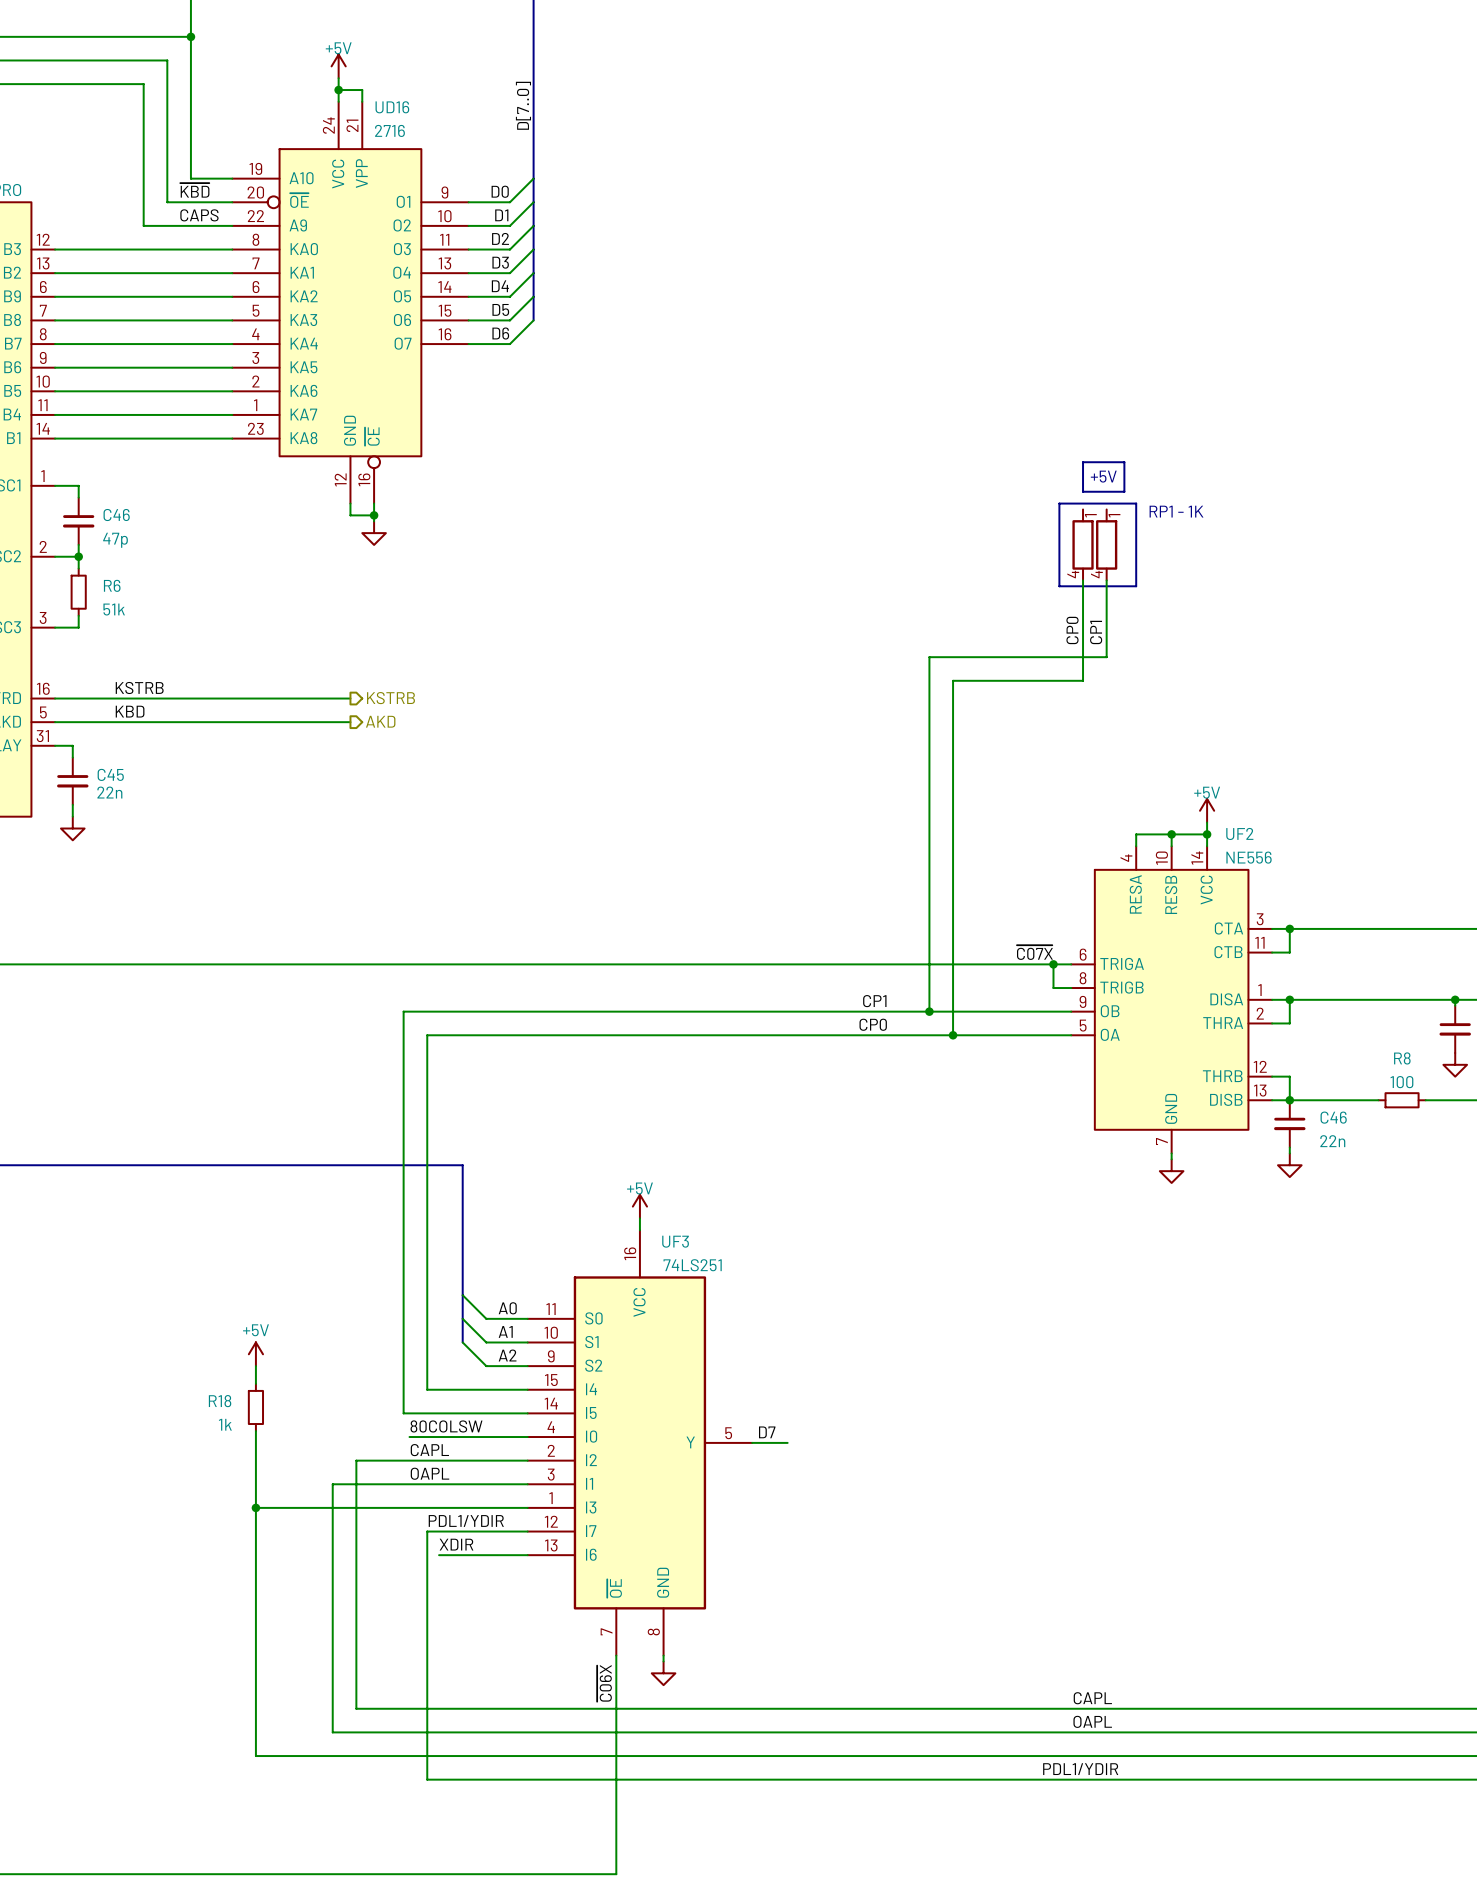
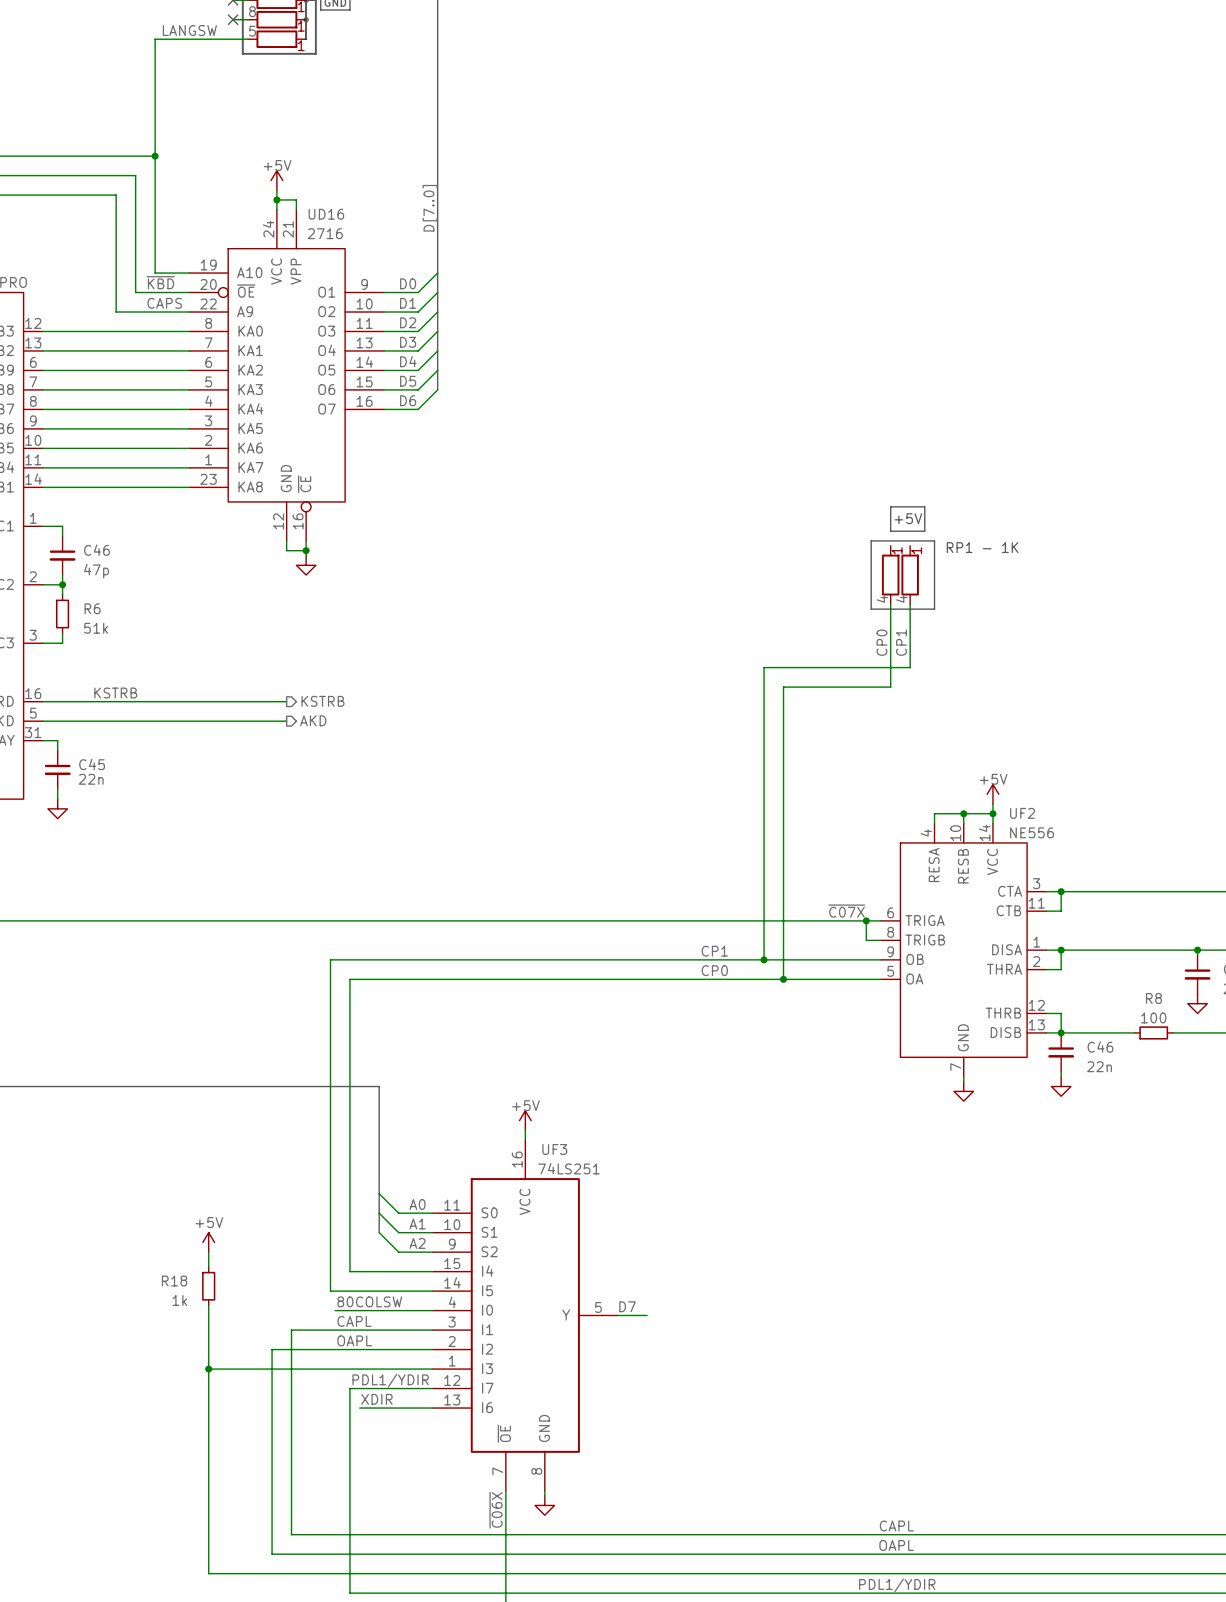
label: KBD (130, 711) -> none
UF3 pin number: 2 (551, 1450) -> 3 (452, 1322)
UF3 pin name: I2 (591, 1460) -> I1 (487, 1329)
UF3 pin number: 3 (551, 1474) -> 2 (452, 1341)
UF3 pin name: I1 (589, 1483) -> I2 (487, 1349)

